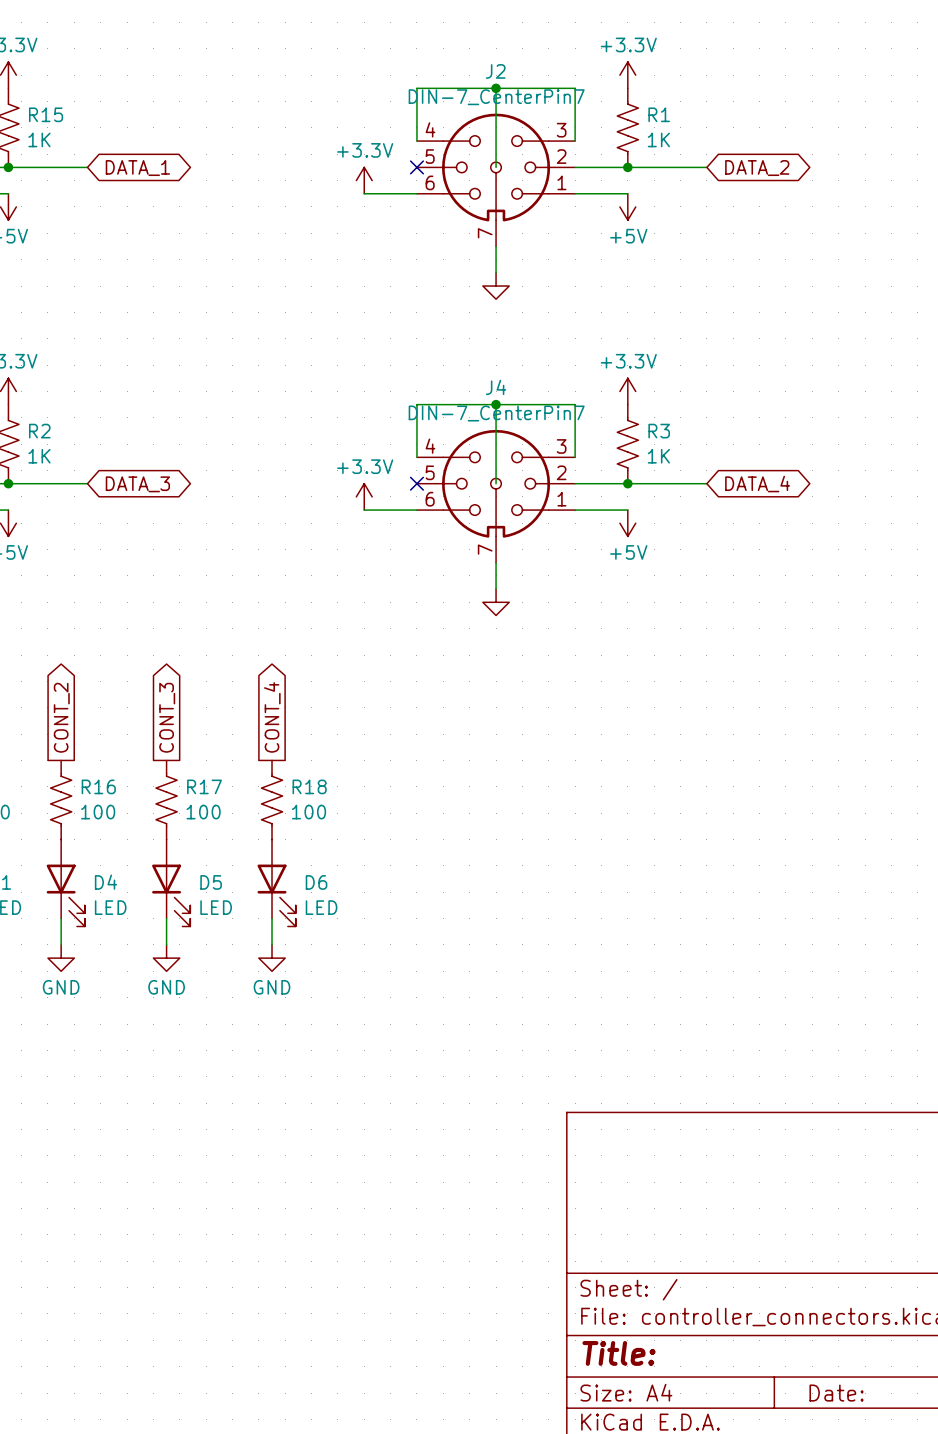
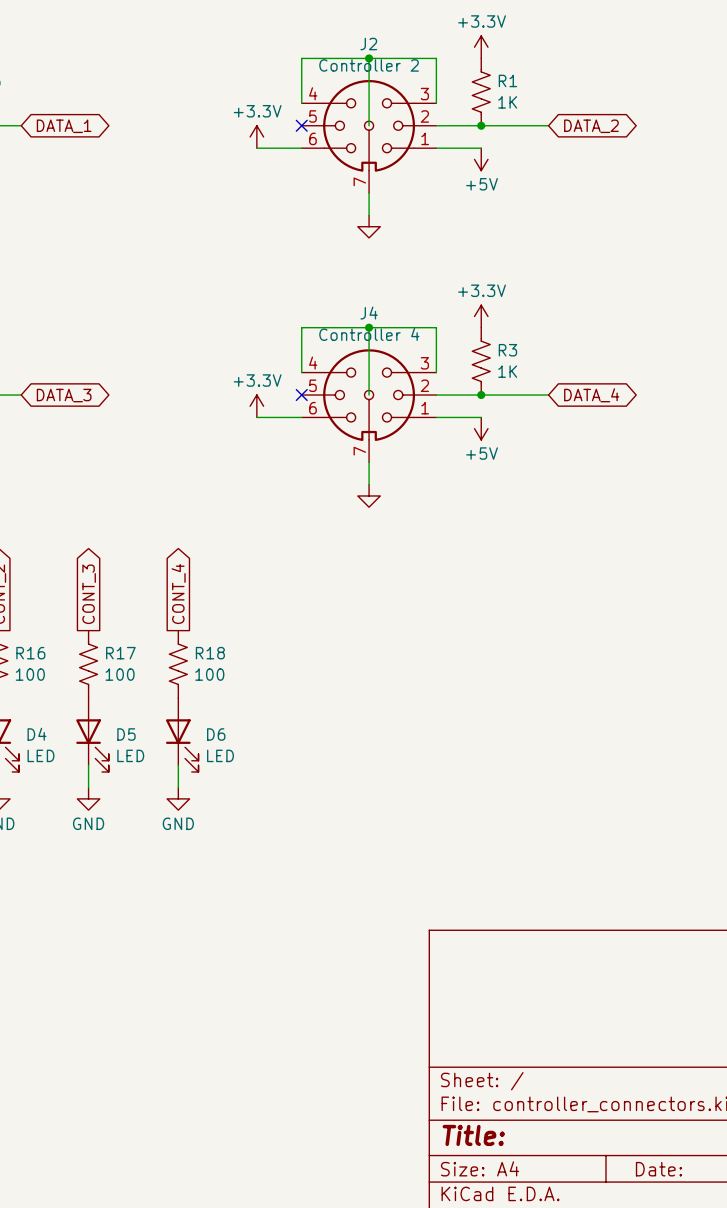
J2 value: DIN-7_CenterPin7 (496, 97) -> Controller 2 (369, 65)
J4 value: DIN-7_CenterPin7 (496, 413) -> Controller 4 (369, 334)

